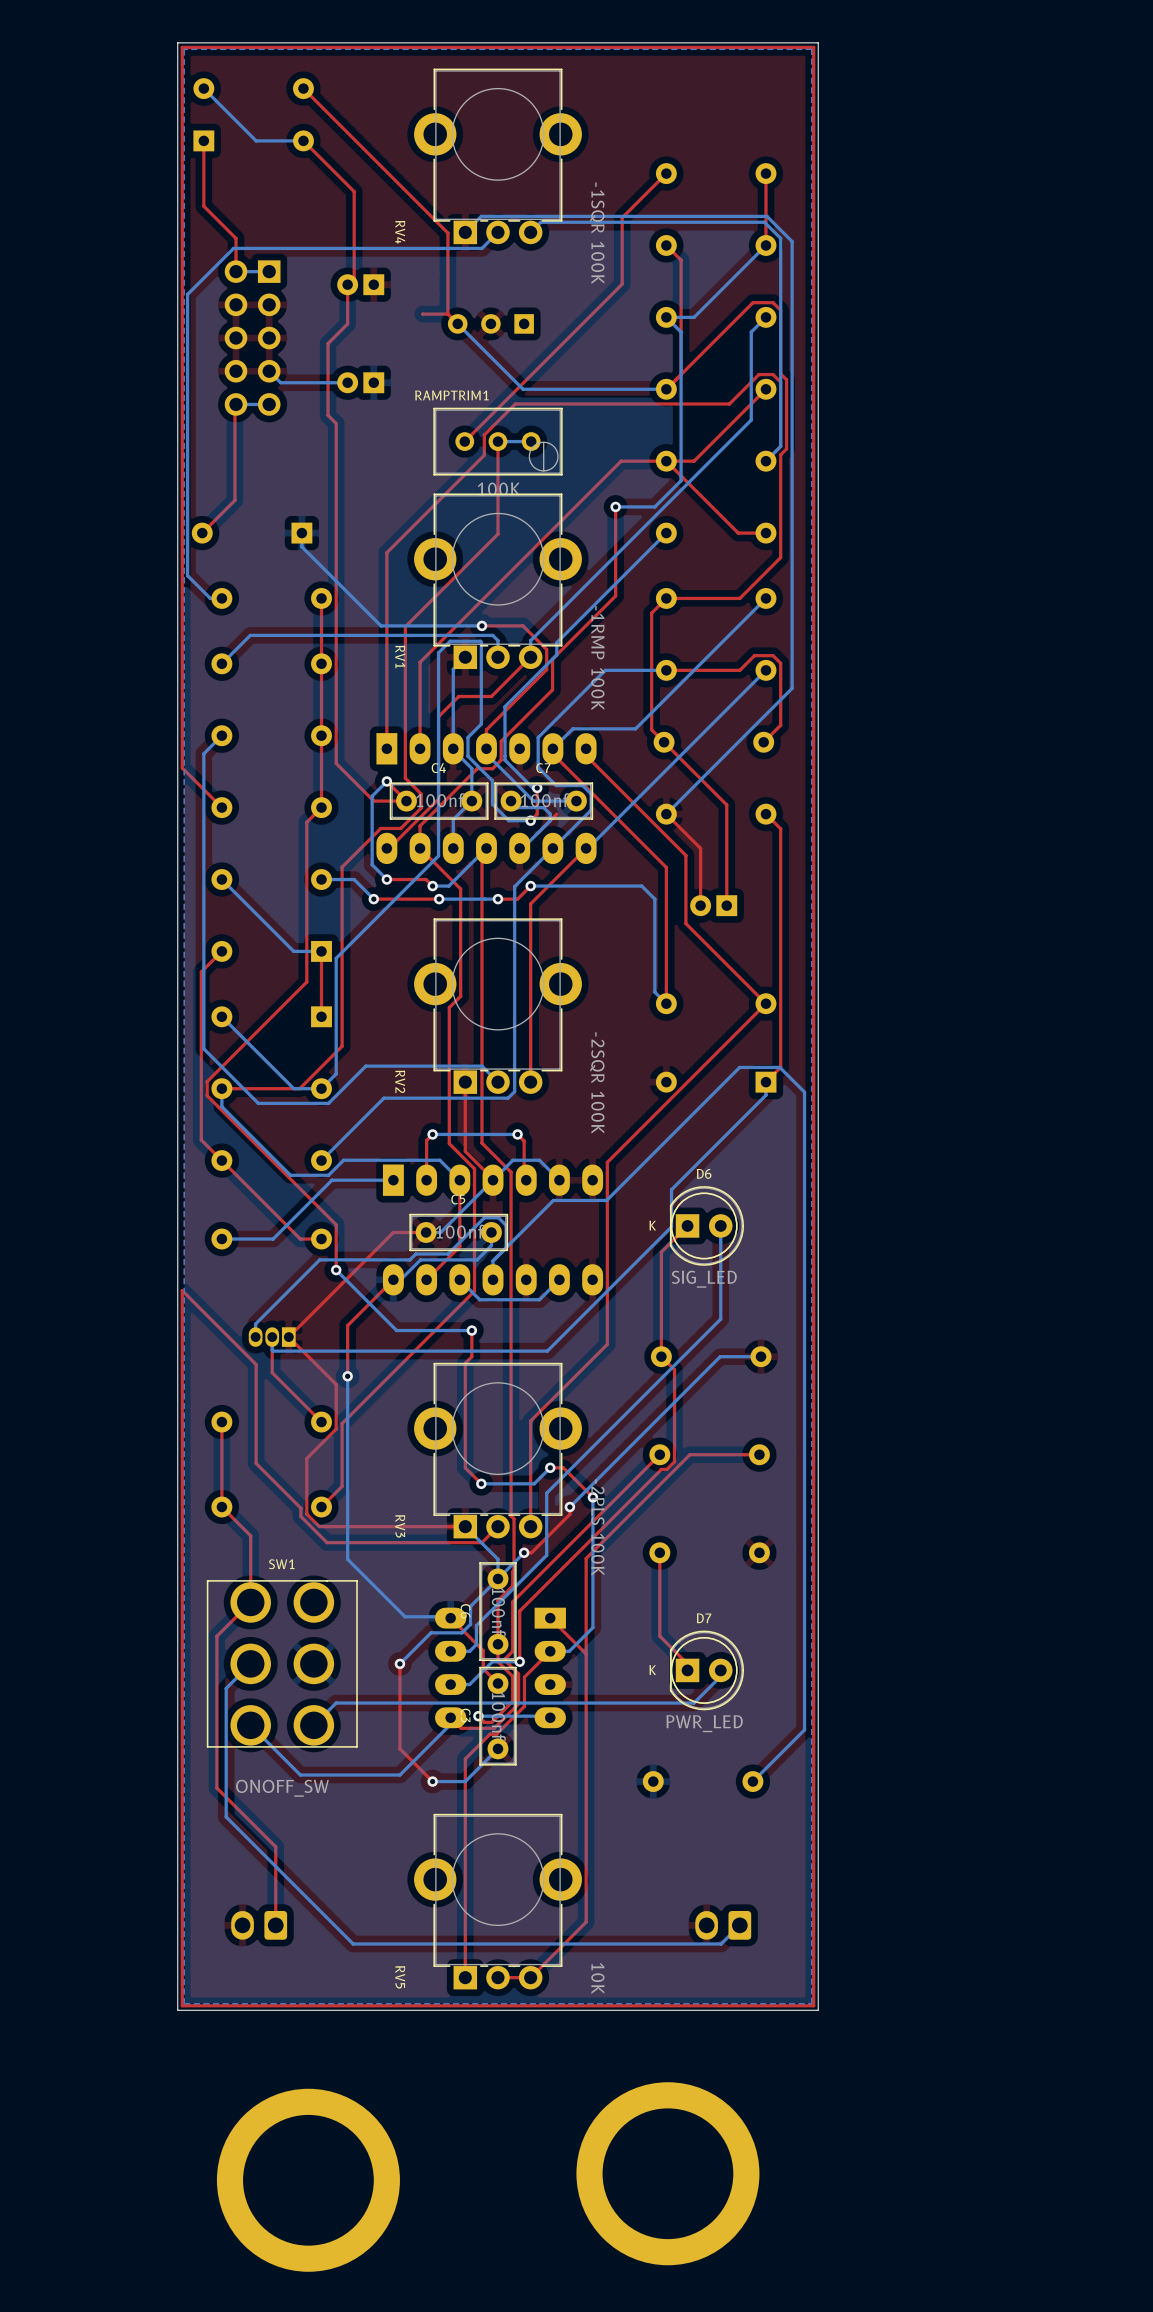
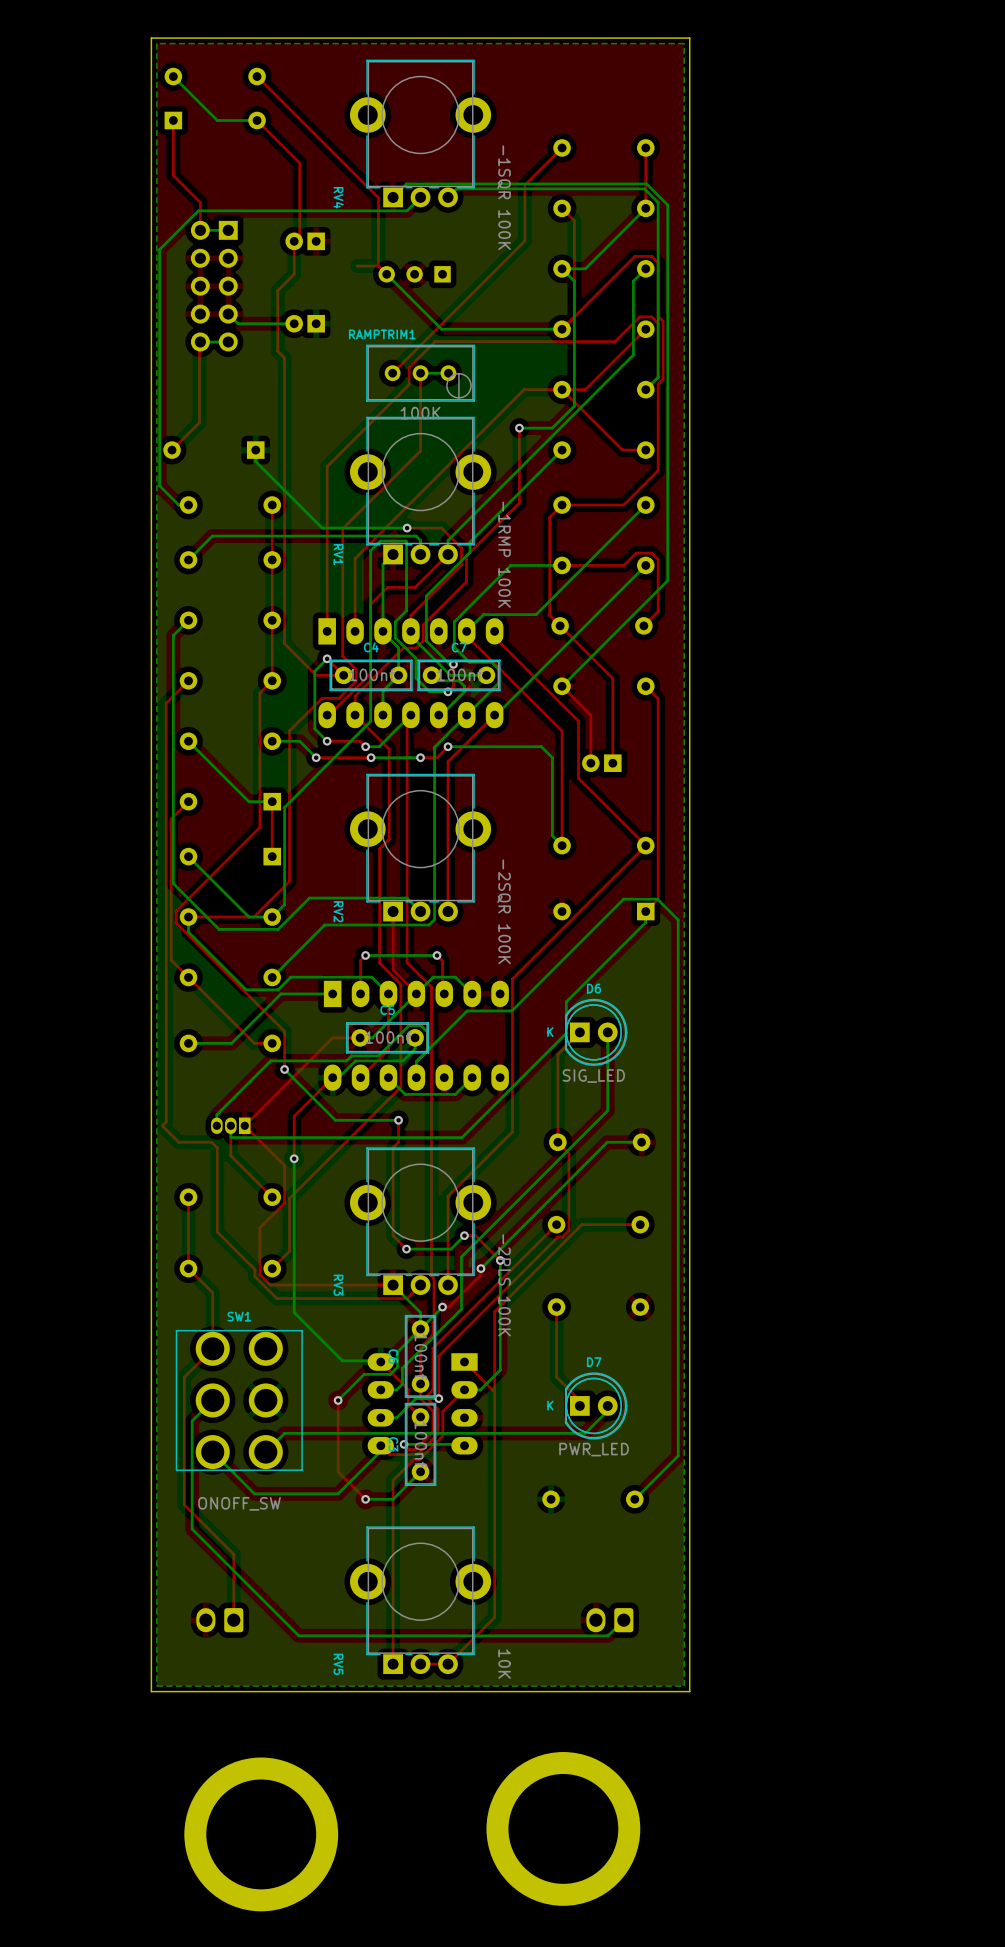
top track: (221, 807) (182, 768) (182, 47) (813, 47) (813, 2005) (182, 2005) (182, 1290) (256, 1364) -> (188, 680) (166, 703) (166, 1121) (162, 1125) (178, 1142) (211, 1142) (217, 1148)

